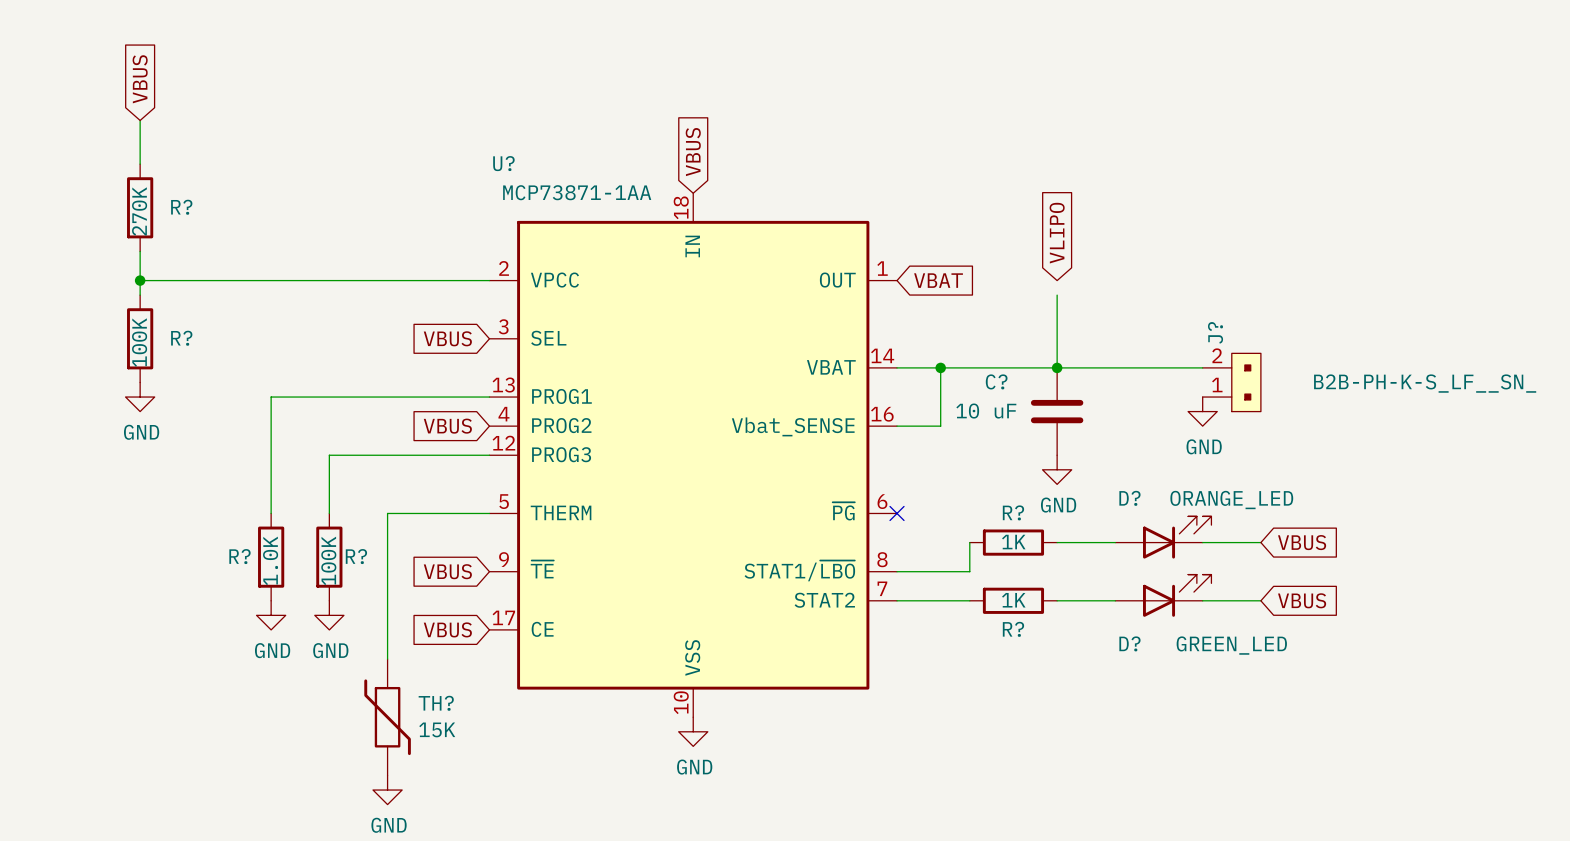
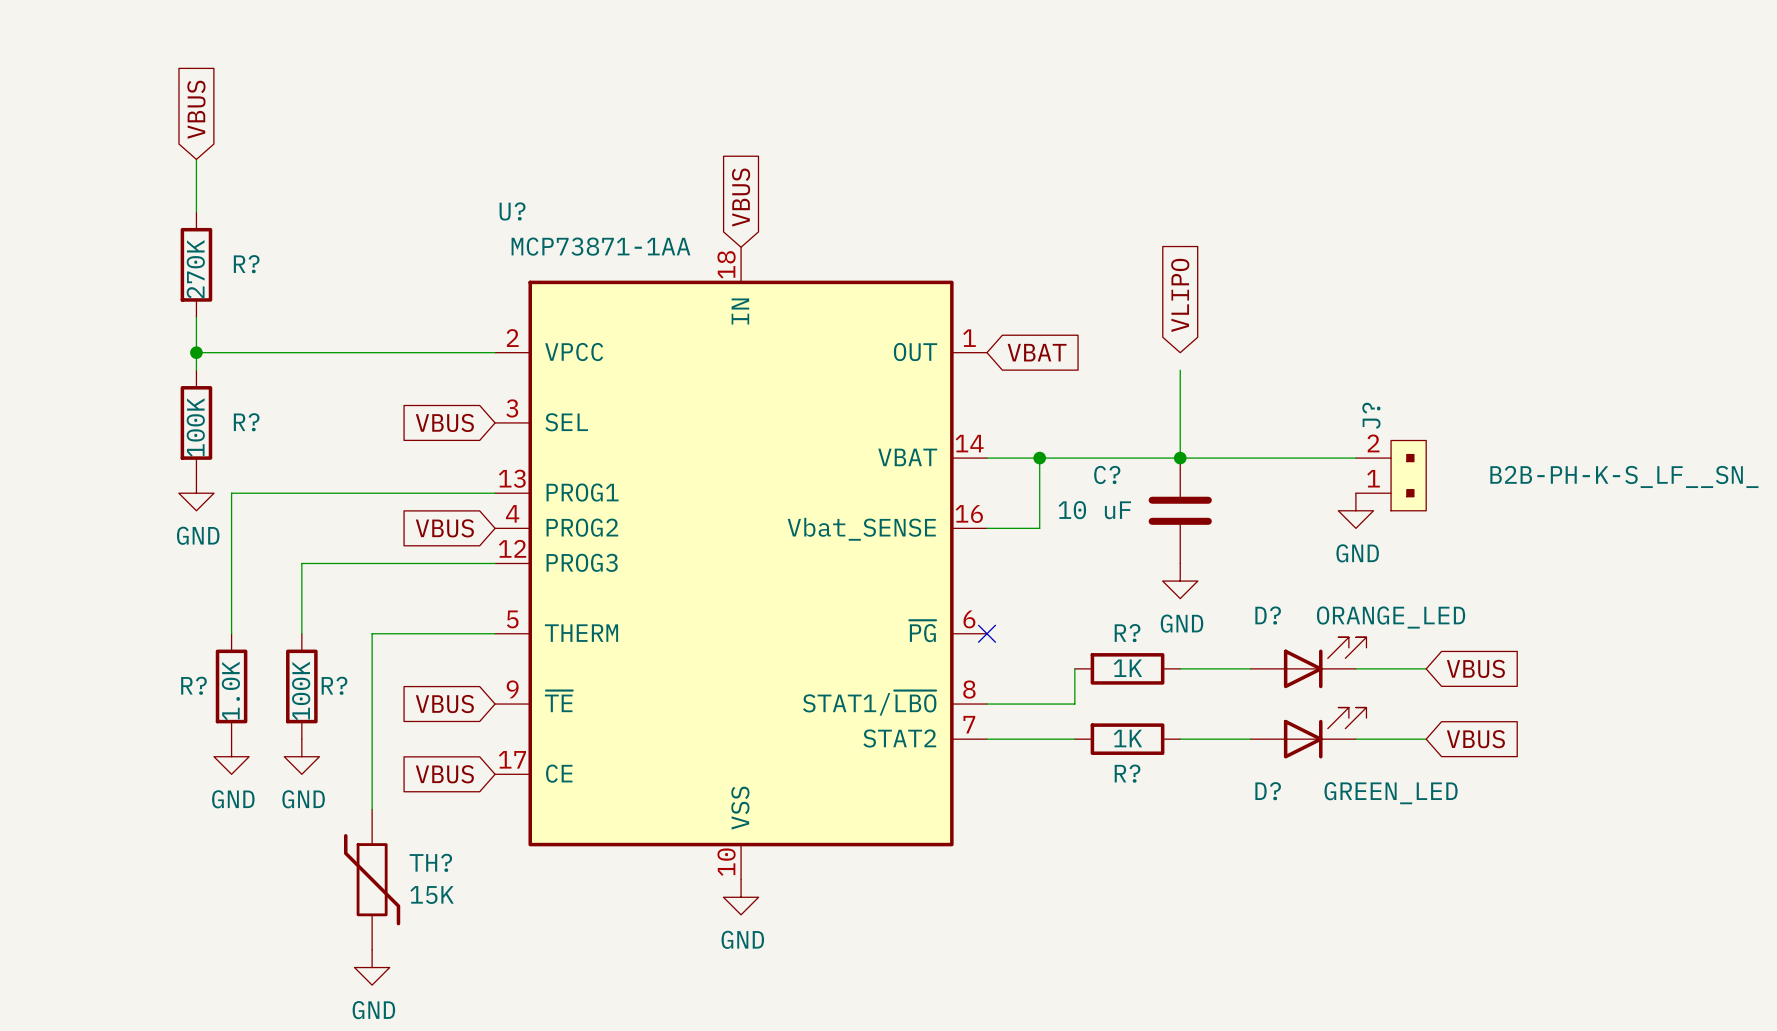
global label position: VBUS (140, 79) -> VBUS (196, 109)
wire: (140, 120) (140, 164) -> (196, 159) (196, 212)
R? position: (140, 207) -> (196, 264)
wire: (140, 251) (140, 295) -> (196, 317) (196, 370)
wire: (140, 280) (242, 280) -> none
junction: (140, 280) -> none
junction: none -> (196, 352)
R? position: (140, 338) -> (196, 422)
power symbol position: GND (140, 397) -> GND (196, 493)

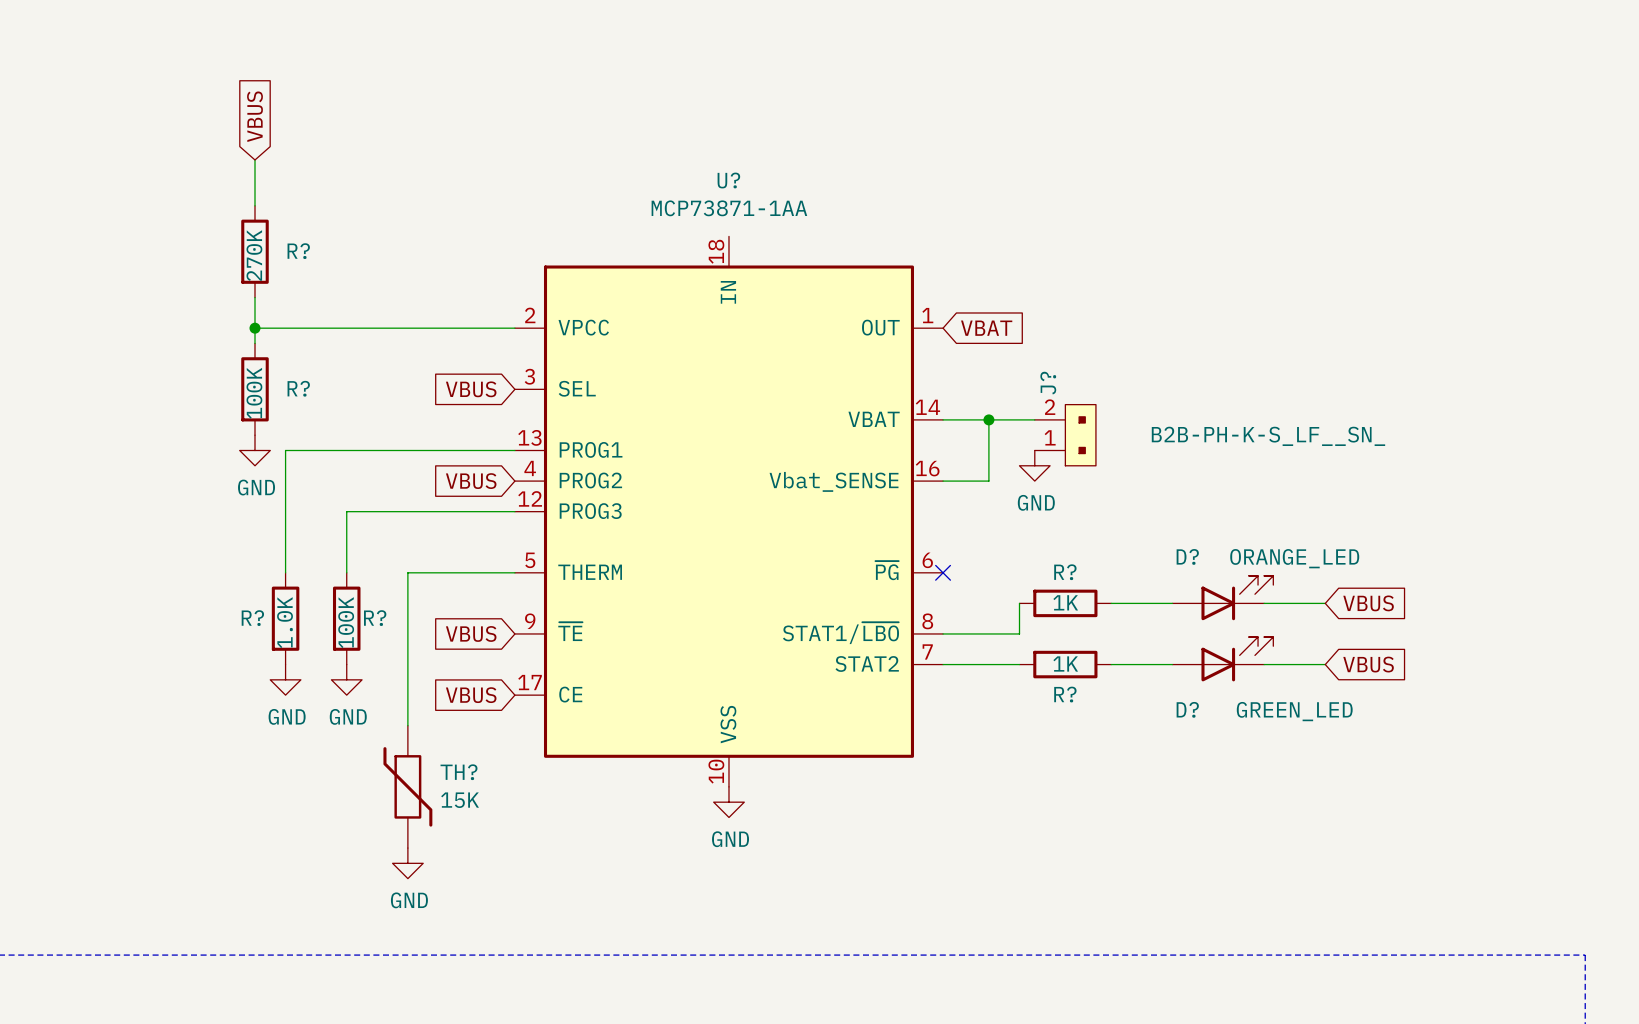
global label: VBUS (741, 197) -> none
U? name position: U? (512, 211) -> U? (728, 180)
U? value position: MCP73871-1AA (600, 246) -> MCP73871-1AA (729, 208)
global label: VLIPO (1180, 295) -> none
wire: (1180, 370) (1180, 458) -> none
wire: (1092, 458) (1355, 458) -> none
junction: (1180, 458) -> none
J? position: (1391, 475) -> (1065, 435)
C?: 10 uF (1180, 510) -> none
power symbol: GND (1355, 510) -> none
power symbol position: GND (1180, 581) -> GND (1034, 465)

